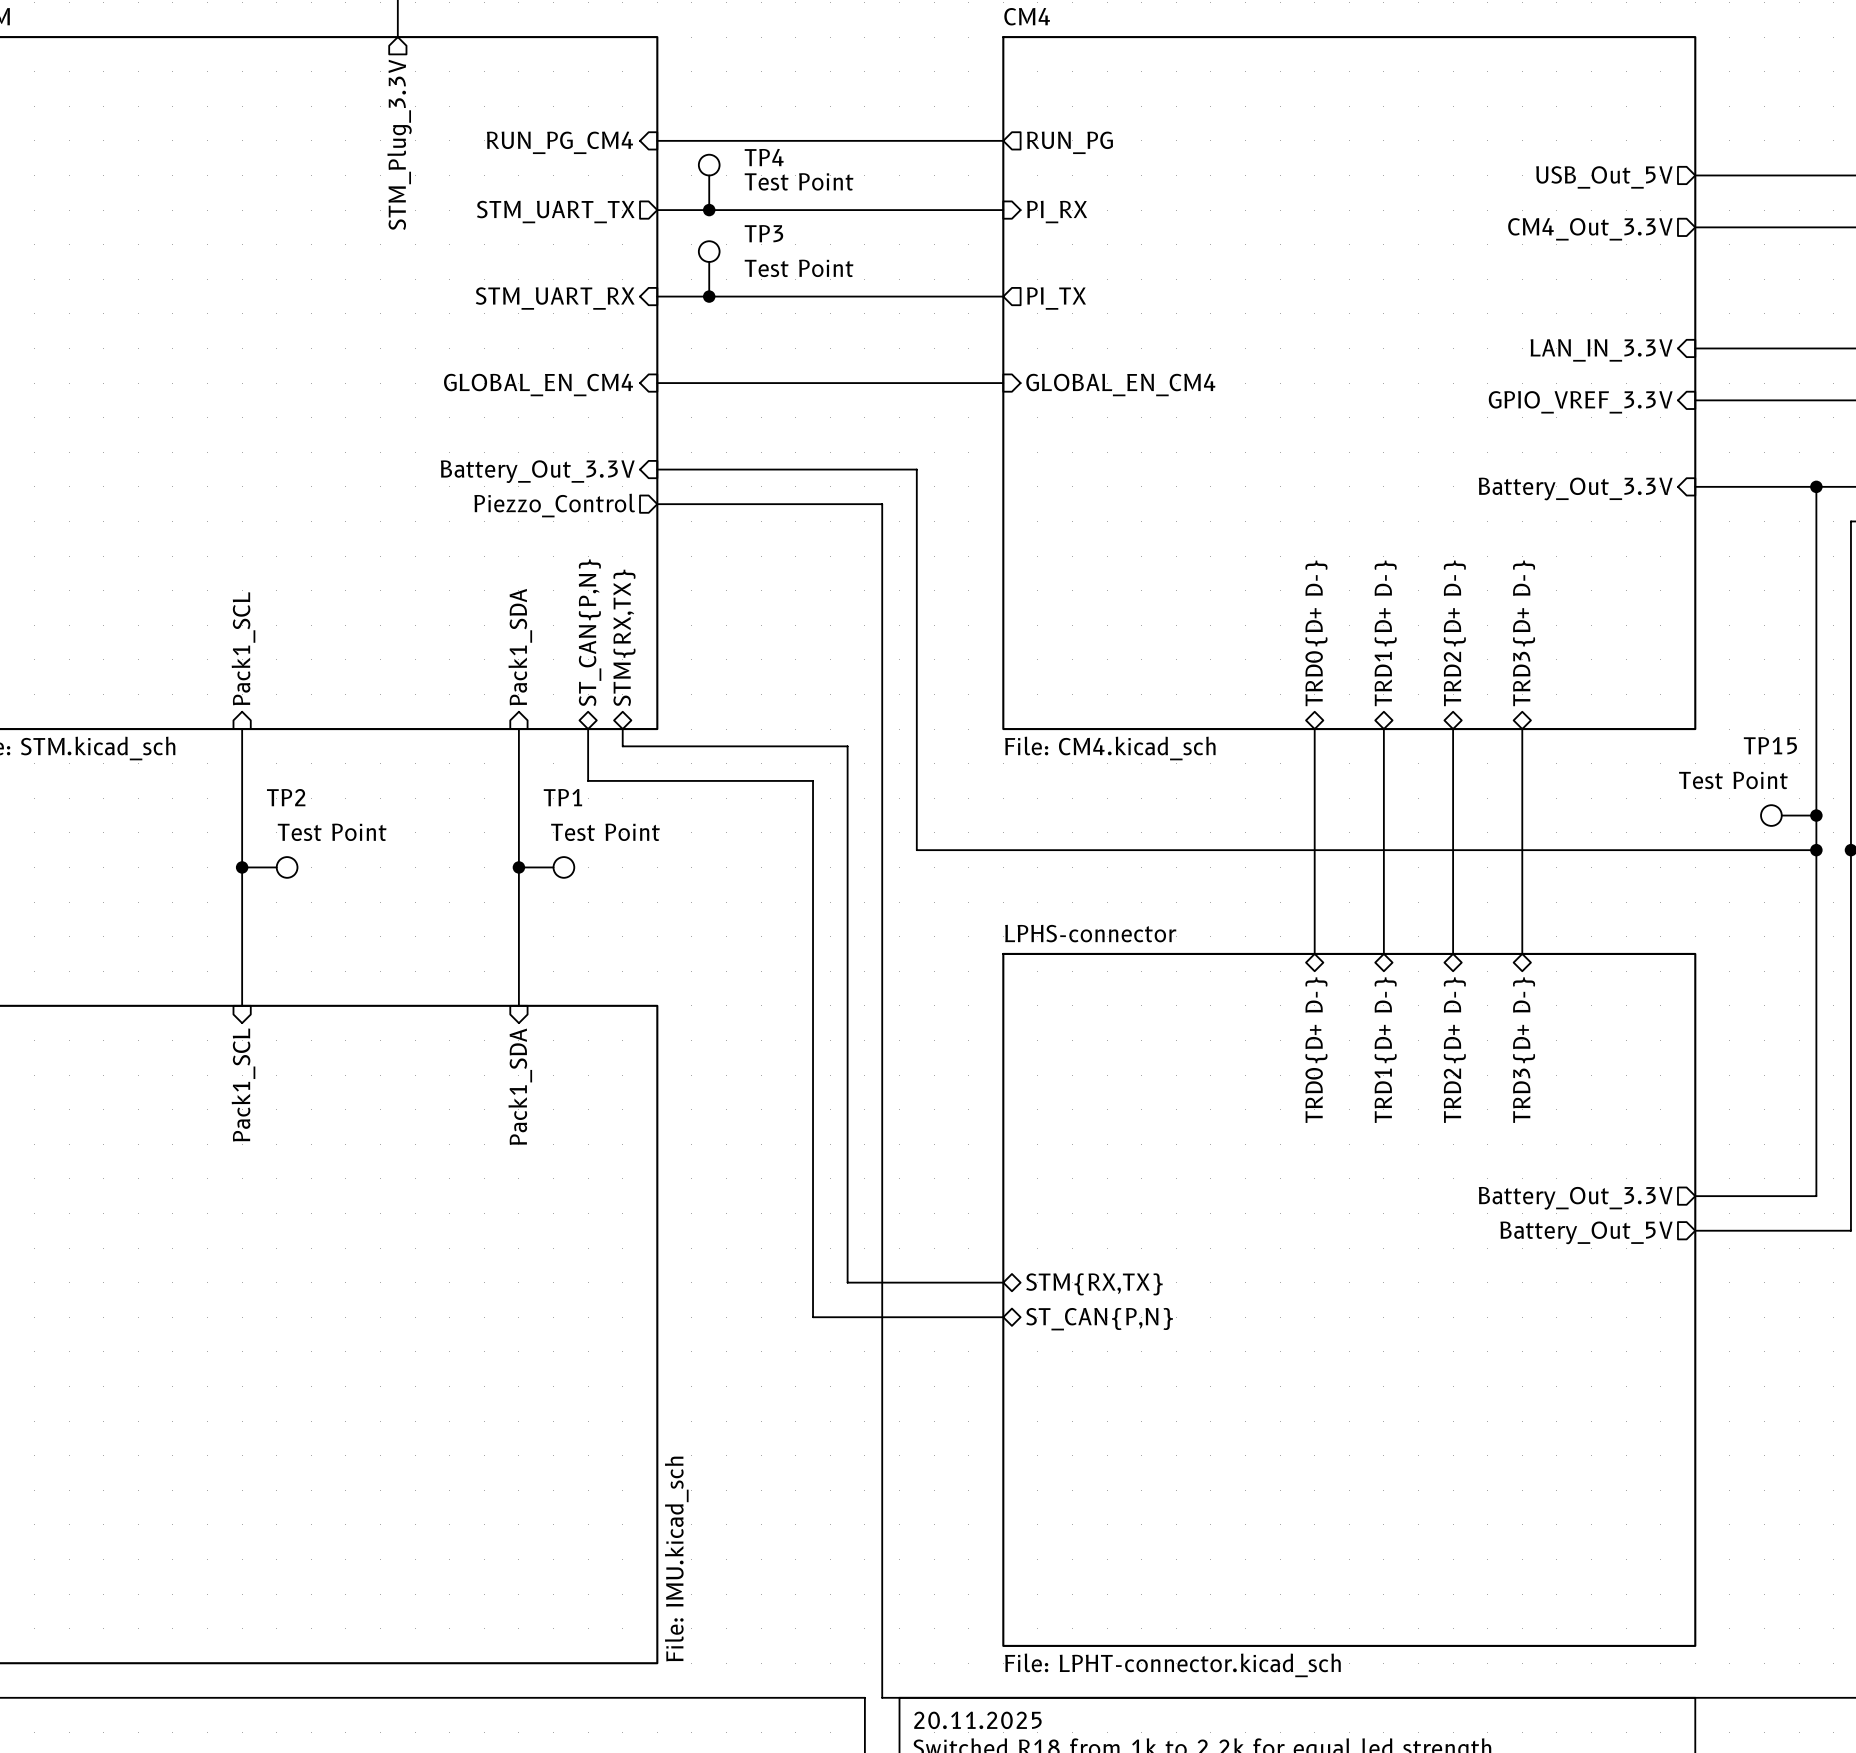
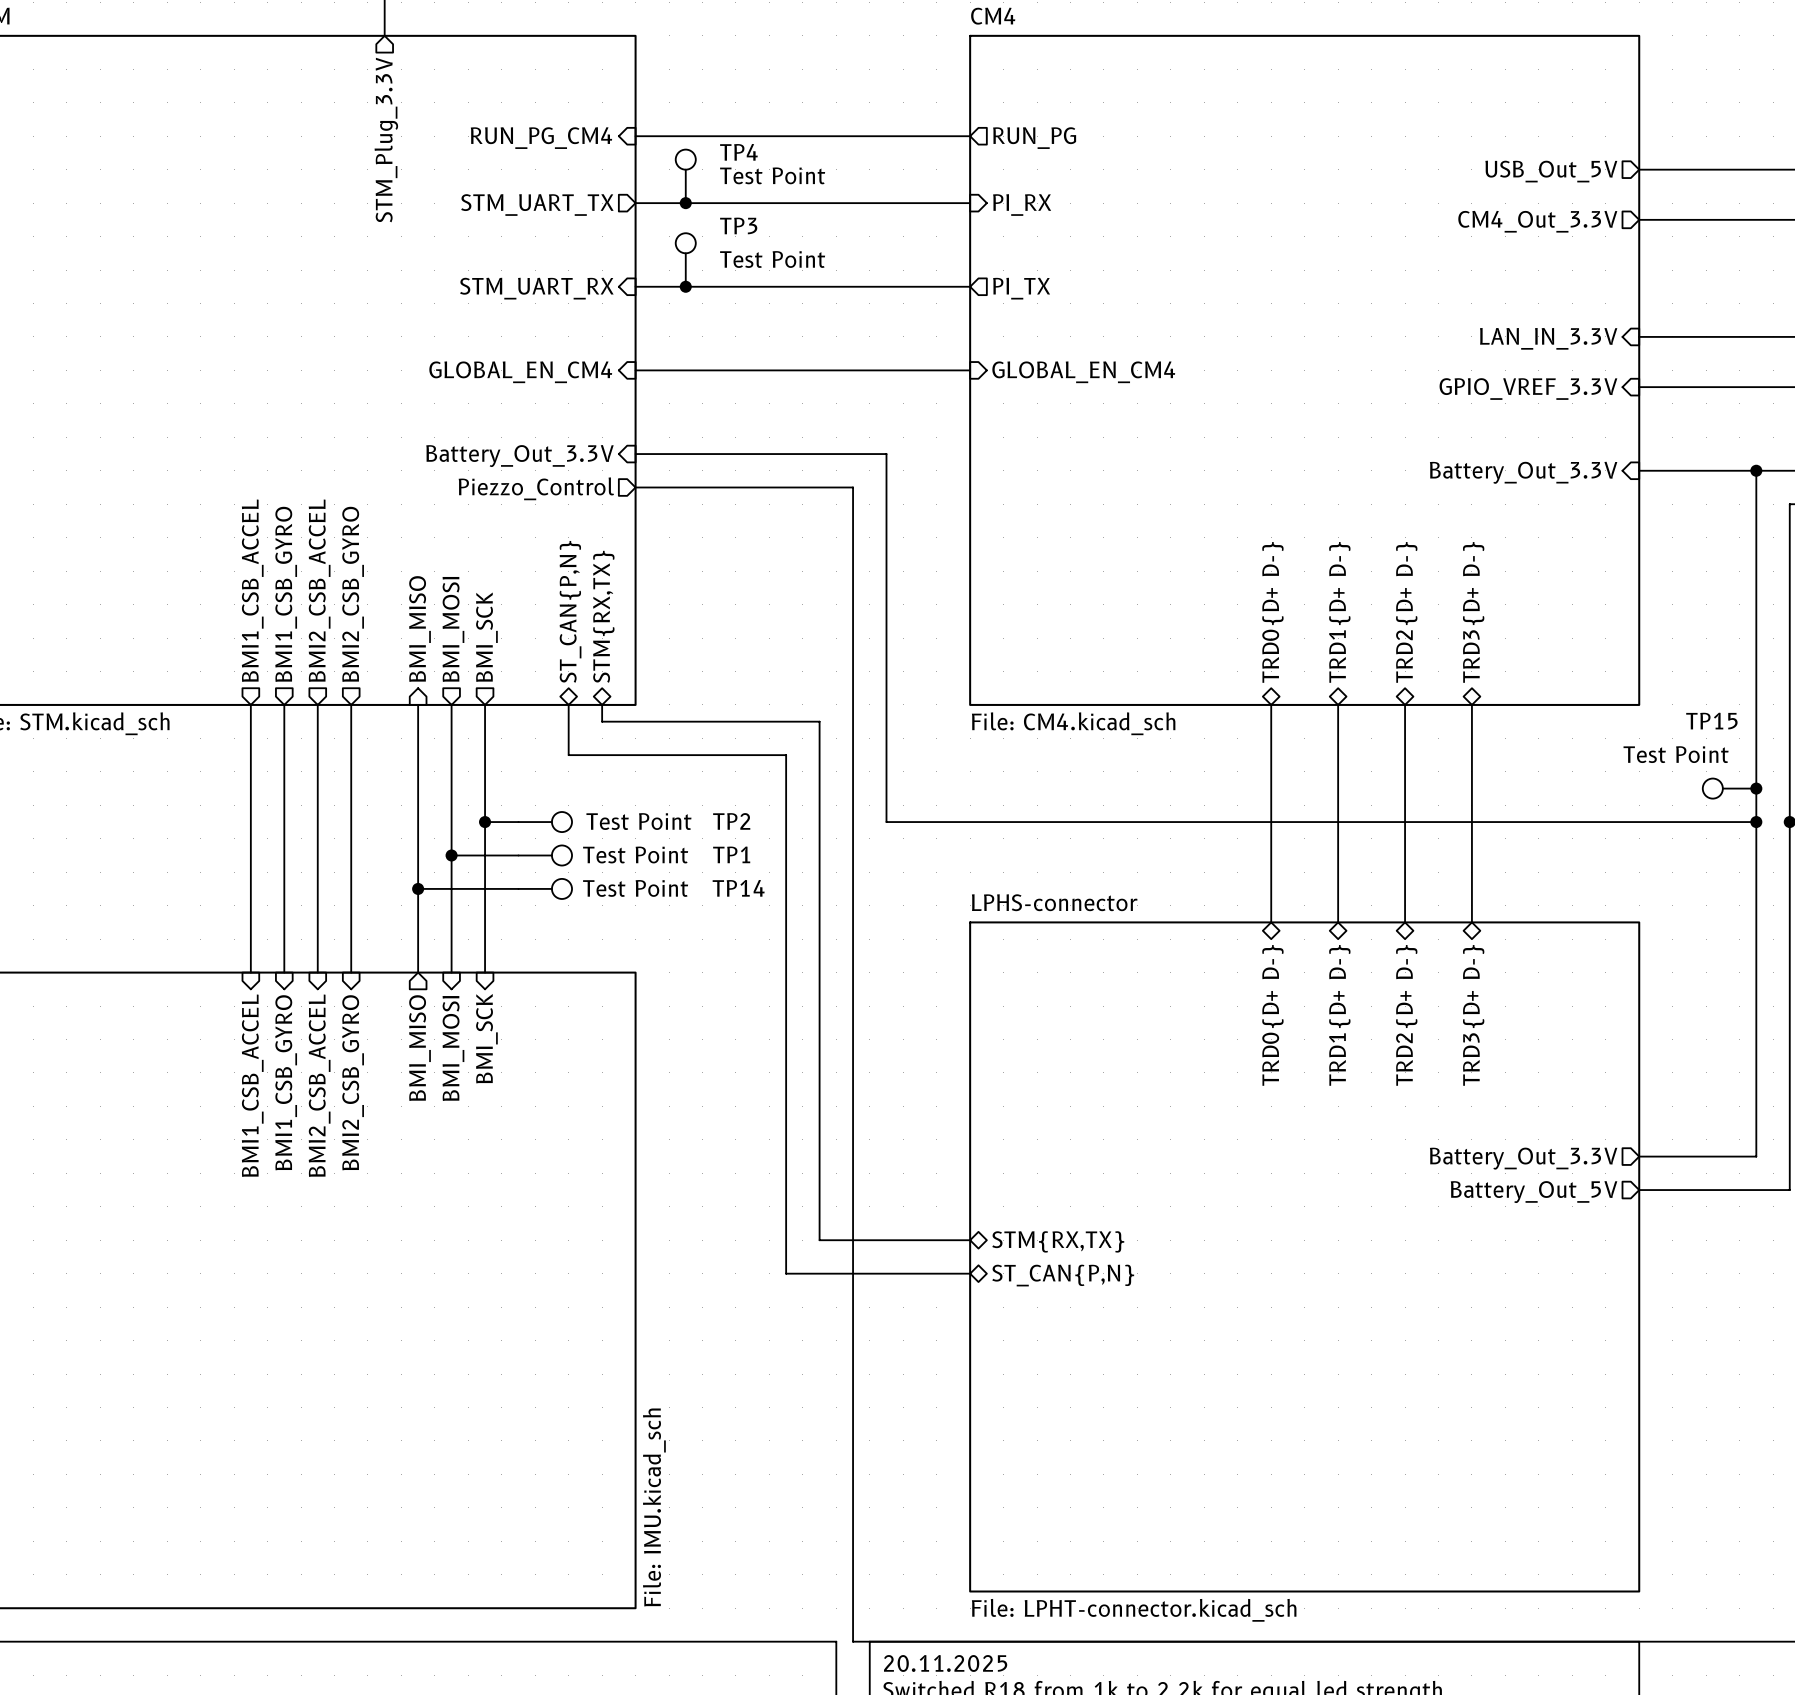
sheet pin: none -> BMI1_CSB_ACCEL (252, 590)
sheet pin: none -> BMI2_CSB_ACCEL (319, 590)
sheet pin: none -> BMI1_CSB_GYRO (286, 594)
sheet pin: none -> BMI2_CSB_GYRO (353, 594)
sheet pin: Pack1_SDA (520, 647) -> none
sheet pin: Pack1_SCL (243, 648) -> none
sheet pin: none -> BMI_MISO (420, 629)
sheet pin: none -> BMI_MOSI (453, 629)
sheet pin: none -> BMI_SCK (486, 637)
wire: (242, 729) (242, 1005) -> (250, 704) (250, 972)
wire: none -> (284, 704) (284, 972)
wire: none -> (317, 704) (317, 972)
wire: none -> (351, 704) (351, 972)
wire: none -> (418, 704) (418, 972)
wire: none -> (451, 704) (451, 972)
wire: (518, 729) (518, 1005) -> (485, 704) (485, 972)
TP2 name position: TP2 (286, 797) -> TP2 (731, 821)
TP1 name position: TP1 (562, 797) -> TP1 (731, 854)
TP2 value position: Test Point (332, 832) -> Test Point (638, 821)
TP1 value position: Test Point (605, 832) -> Test Point (635, 855)
wire: none -> (485, 822) (518, 822)
junction: (242, 867) -> none
TP2 position: (269, 867) -> (545, 822)
junction position: (518, 867) -> (485, 822)
TP1 position: (546, 867) -> (545, 855)
wire: none -> (451, 855) (518, 855)
junction: none -> (451, 855)
wire: none -> (418, 888) (518, 888)
junction: none -> (418, 888)
TP14: none -> Test Point (545, 888)
sheet pin: none -> BMI_SCK (486, 1038)
sheet pin: none -> BMI_MISO (420, 1048)
sheet pin: none -> BMI_MOSI (453, 1048)
sheet pin: Pack1_SCL (243, 1085) -> none
sheet pin: Pack1_SDA (520, 1086) -> none
sheet pin: none -> BMI1_CSB_GYRO (286, 1082)
sheet pin: none -> BMI2_CSB_GYRO (353, 1082)
sheet pin: none -> BMI1_CSB_ACCEL (252, 1085)
sheet pin: none -> BMI2_CSB_ACCEL (319, 1085)

